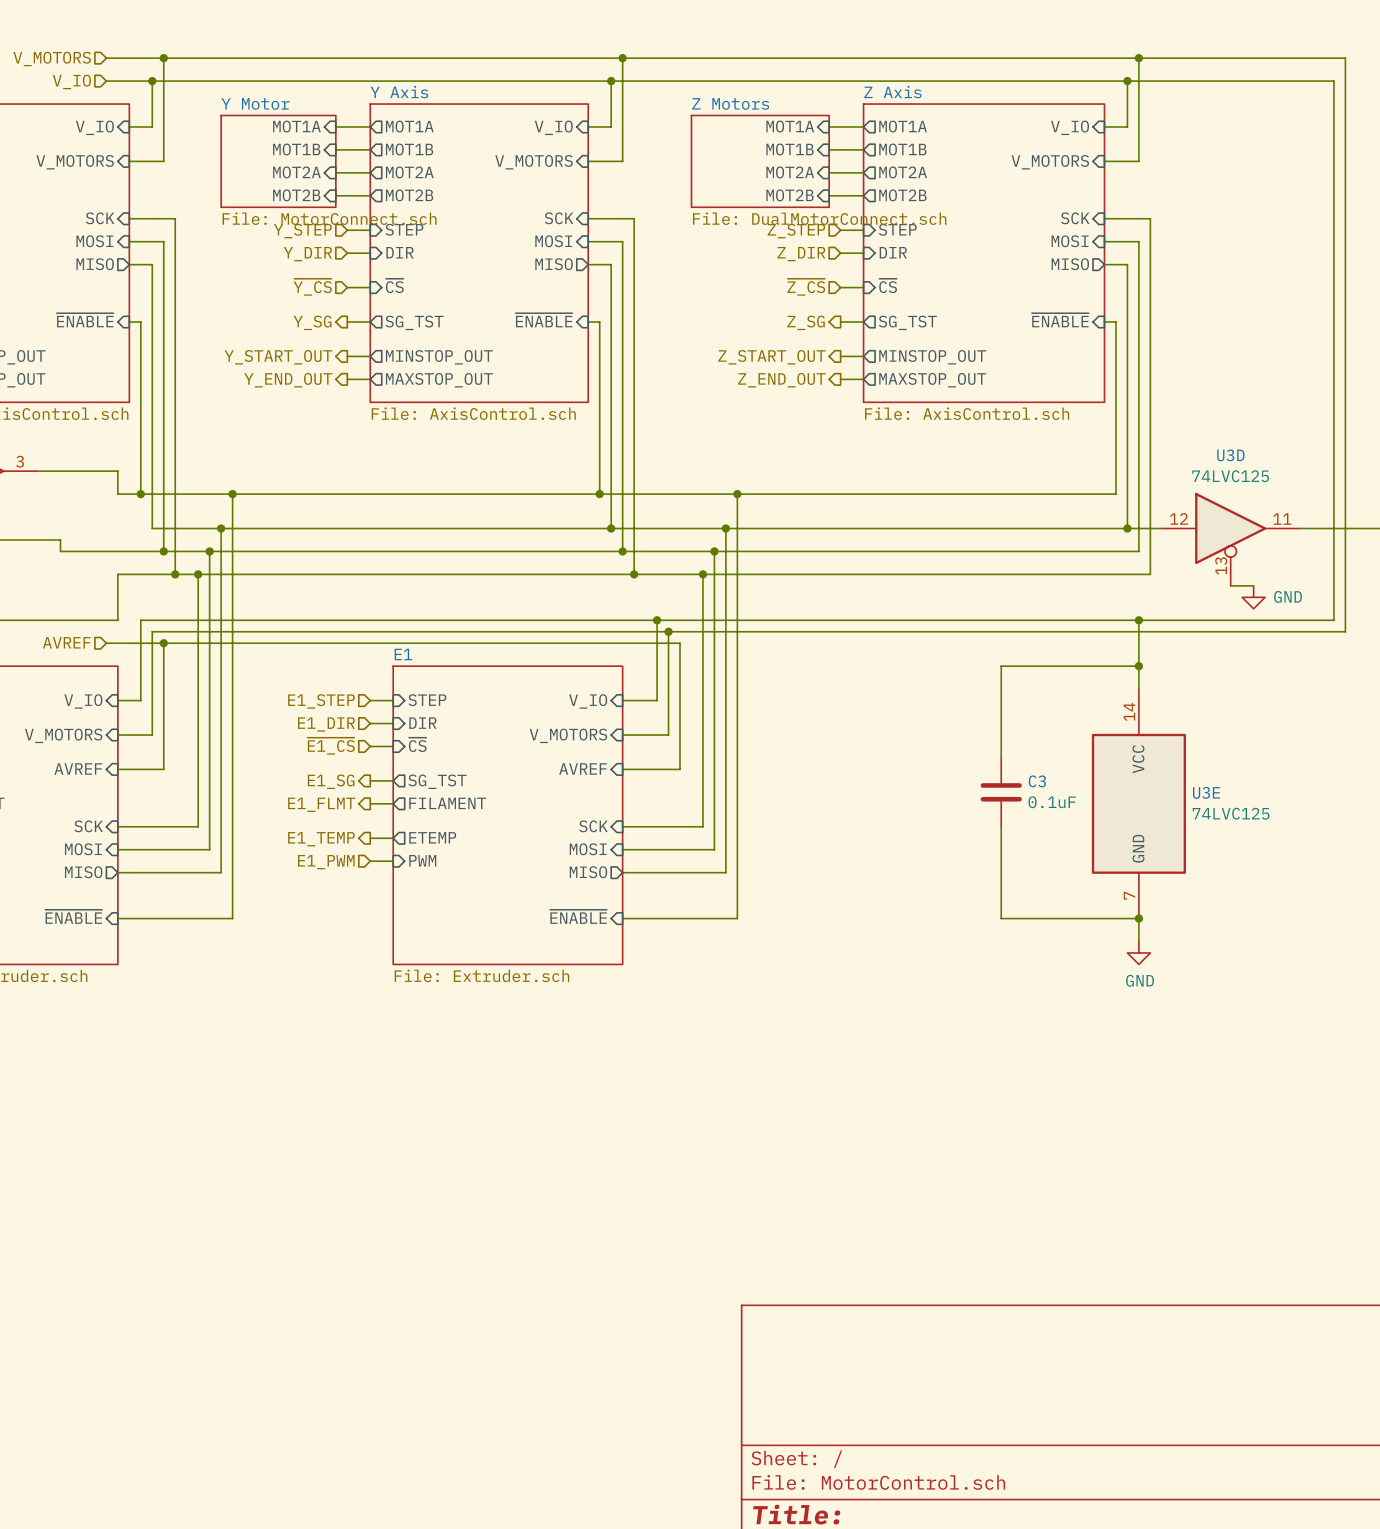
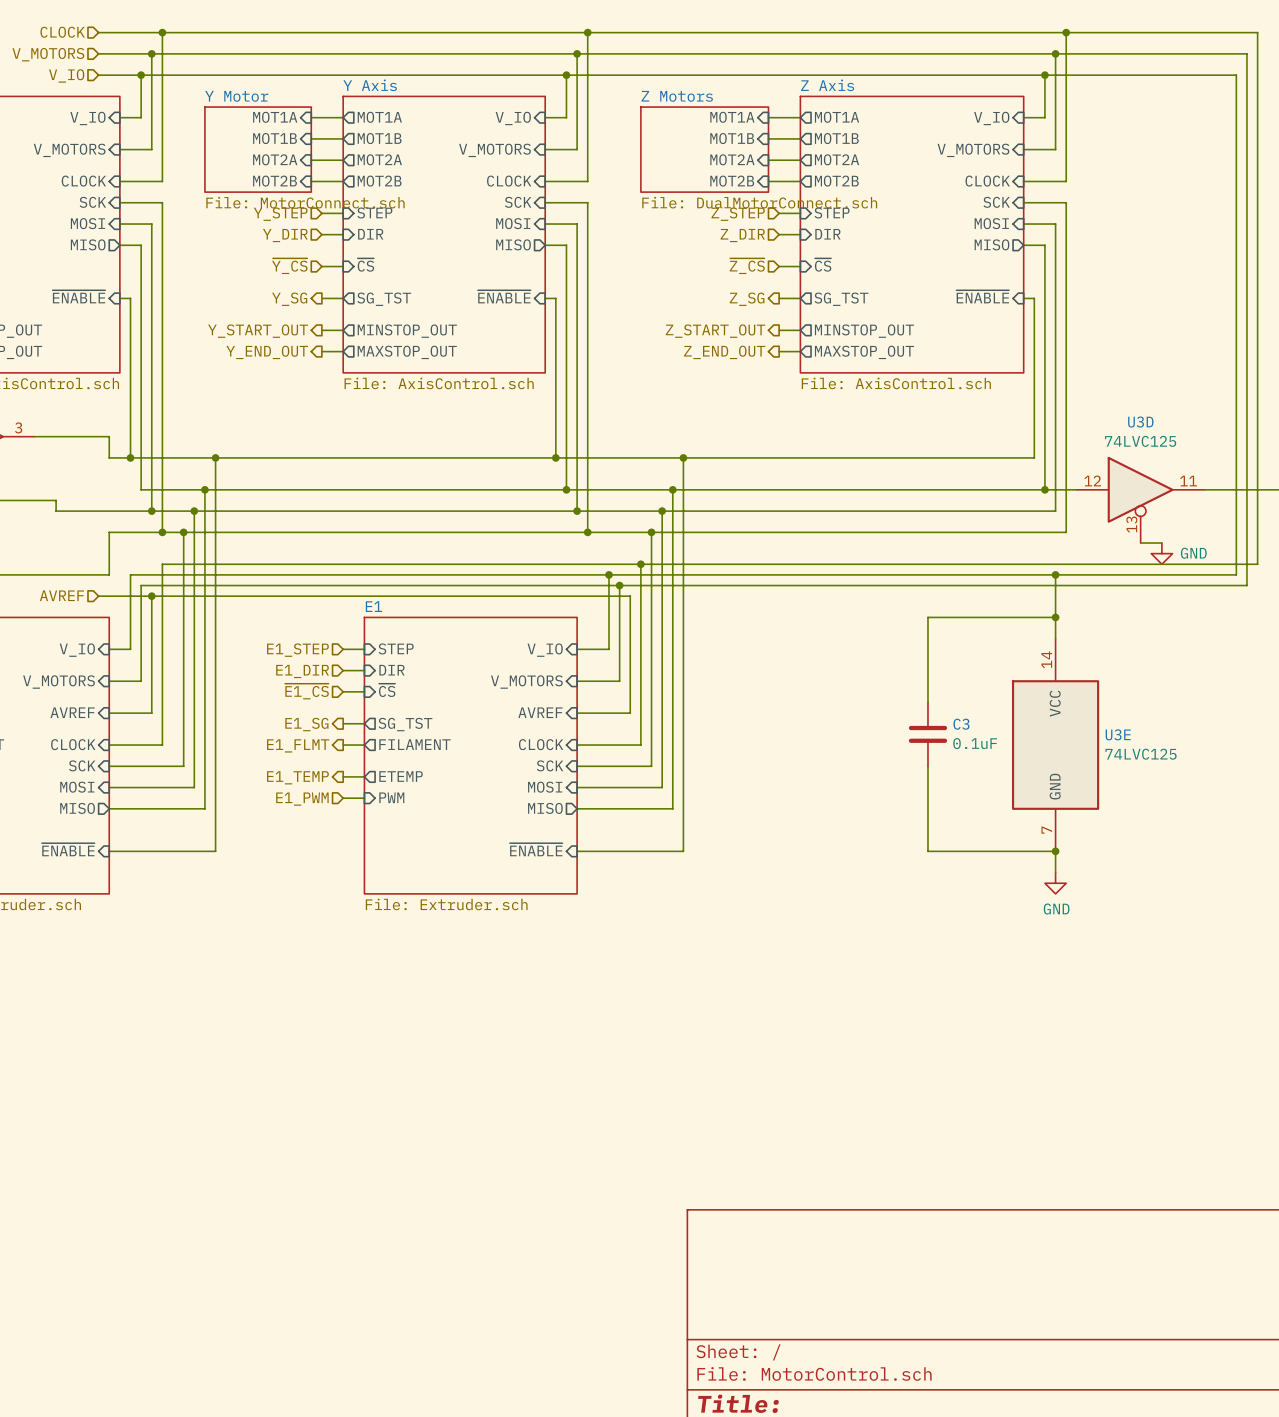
hierarchical label: none -> CLOCK (62, 32)
wire: none -> (98, 32) (1257, 32) (1257, 564) (162, 564) (162, 745) (109, 745)
wire: none -> (162, 32) (162, 181) (119, 181)
junction: none -> (162, 32)
wire: none -> (587, 32) (587, 181) (545, 181)
junction: none -> (587, 32)
wire: none -> (1066, 32) (1066, 181) (1023, 181)
junction: none -> (1066, 32)
sheet pin: none -> CLOCK (83, 181)
sheet pin: none -> CLOCK (509, 181)
sheet pin: none -> CLOCK (987, 181)
wire: none -> (640, 564) (640, 745) (577, 745)
junction: none -> (640, 564)
sheet pin: none -> CLOCK (73, 744)
sheet pin: none -> CLOCK (541, 744)

